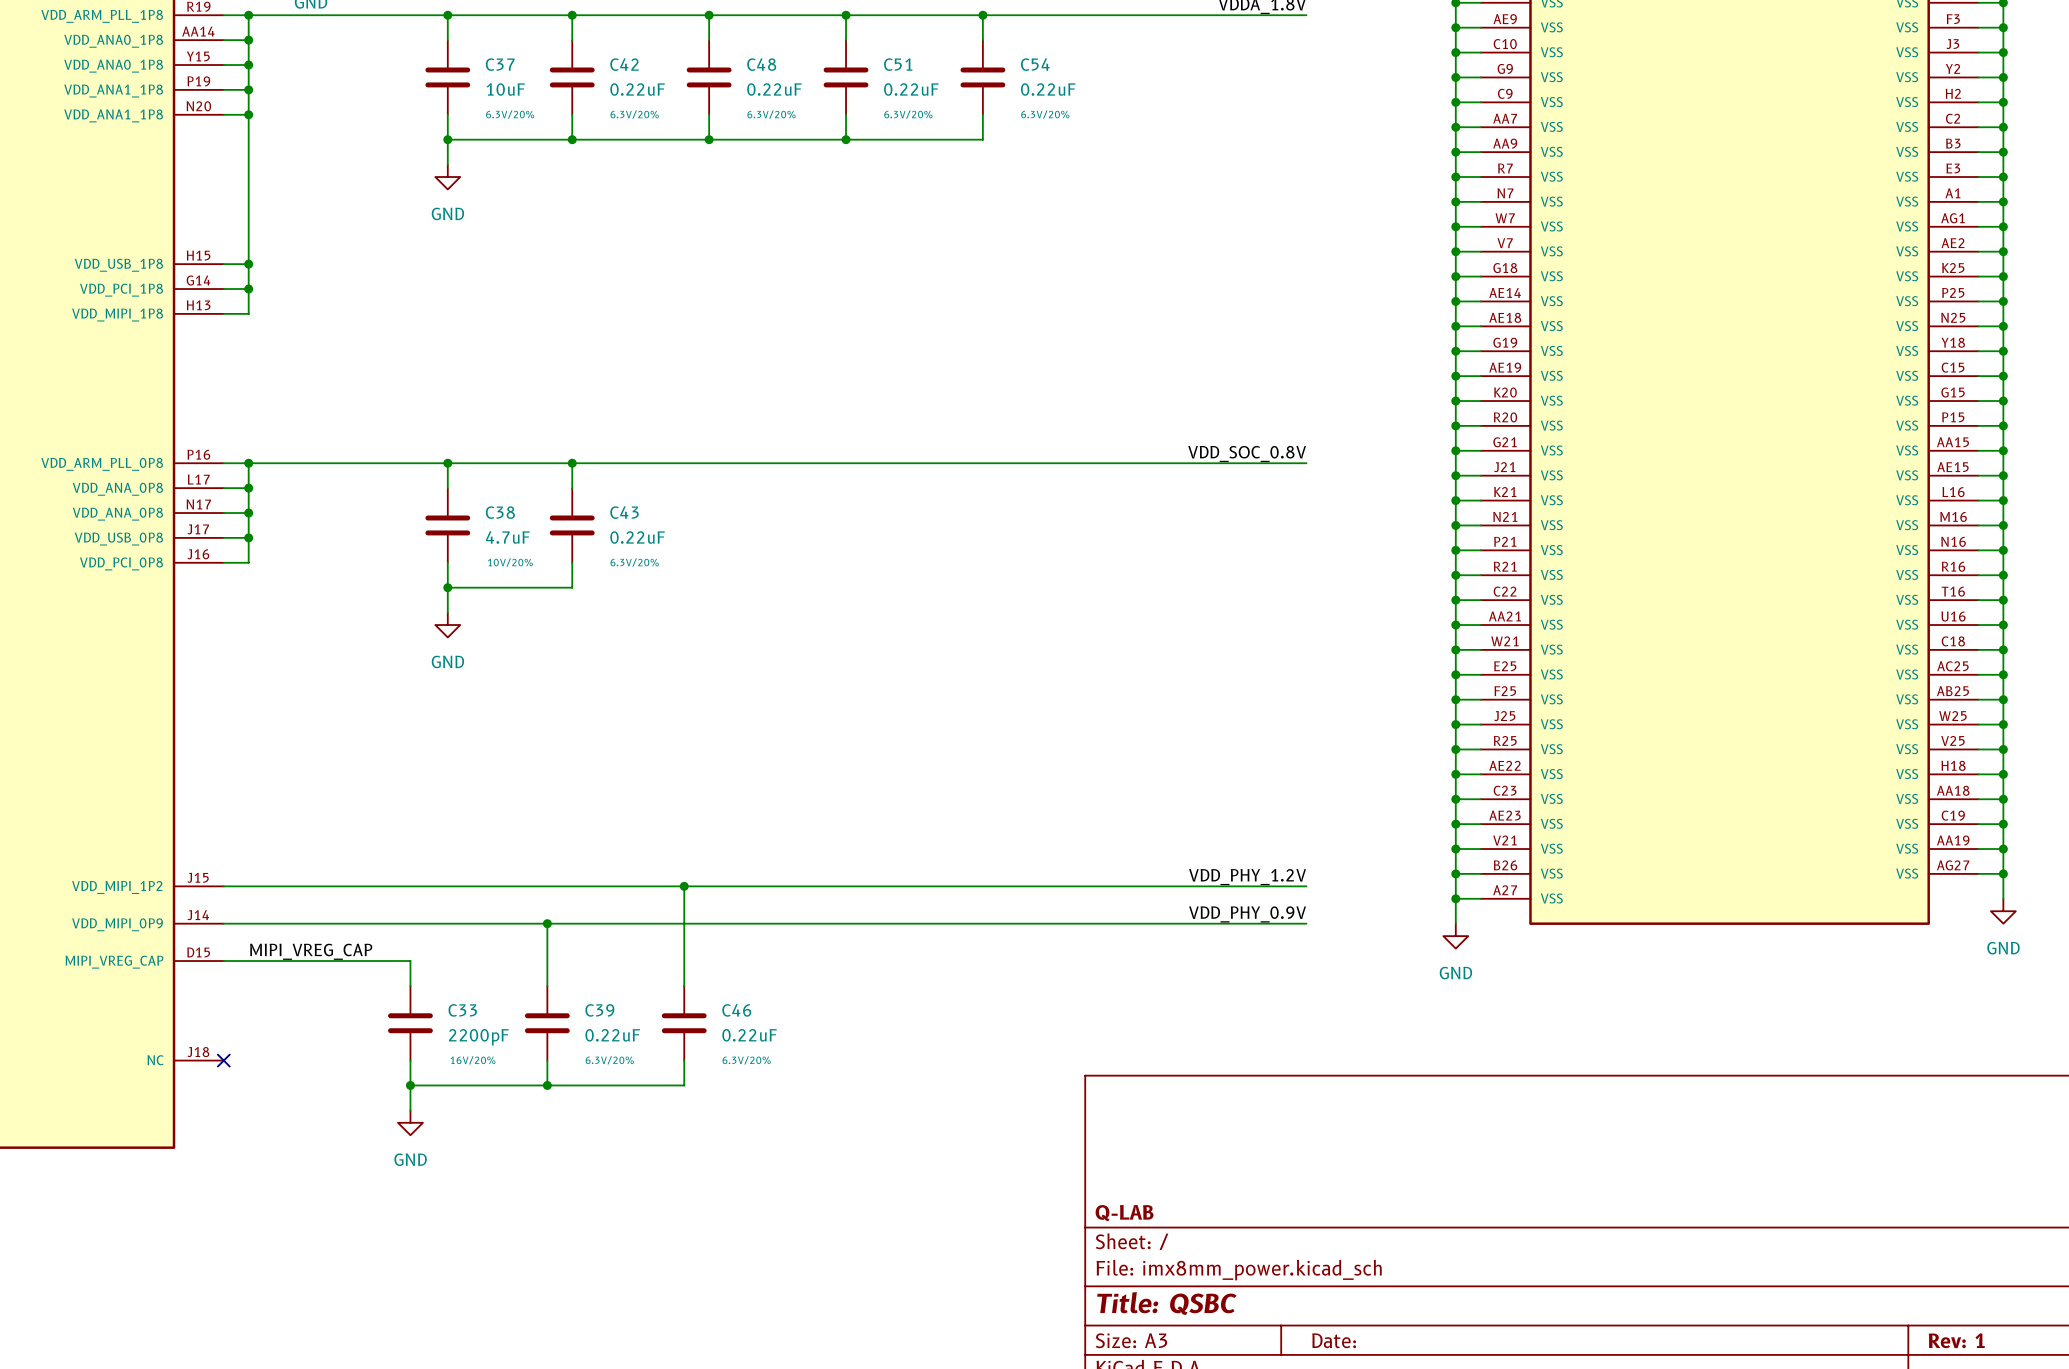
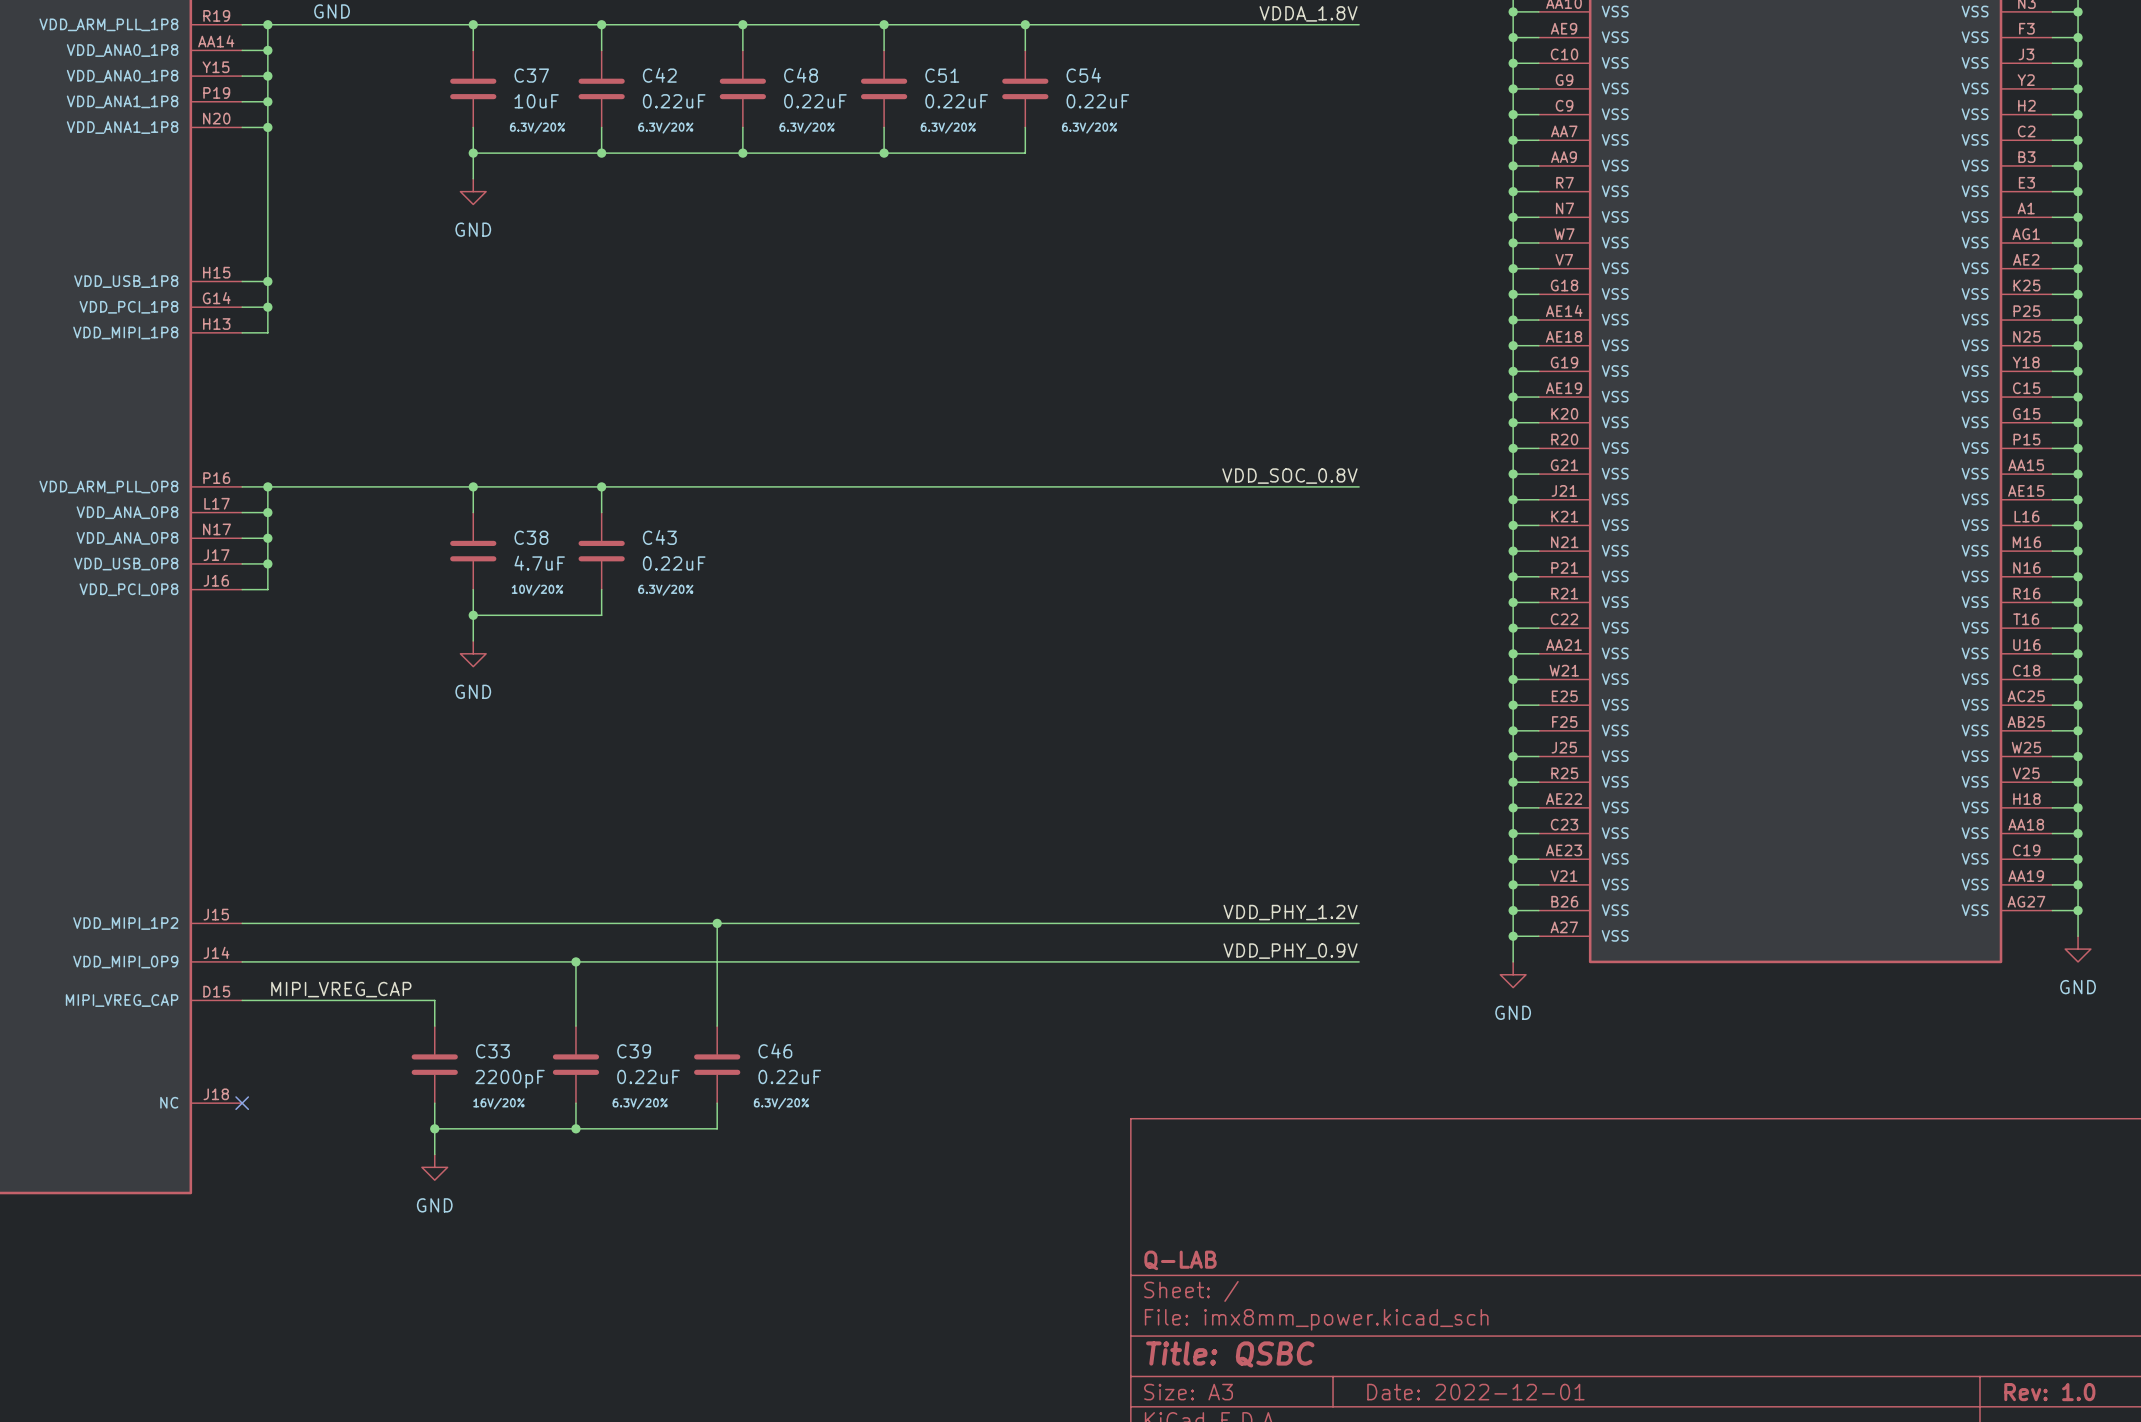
title block: Date: (1334, 1340) -> Date: 2022-12-01 (1475, 1392)
title block: Rev: 1 (1956, 1340) -> Rev: 1.0 (2049, 1392)

